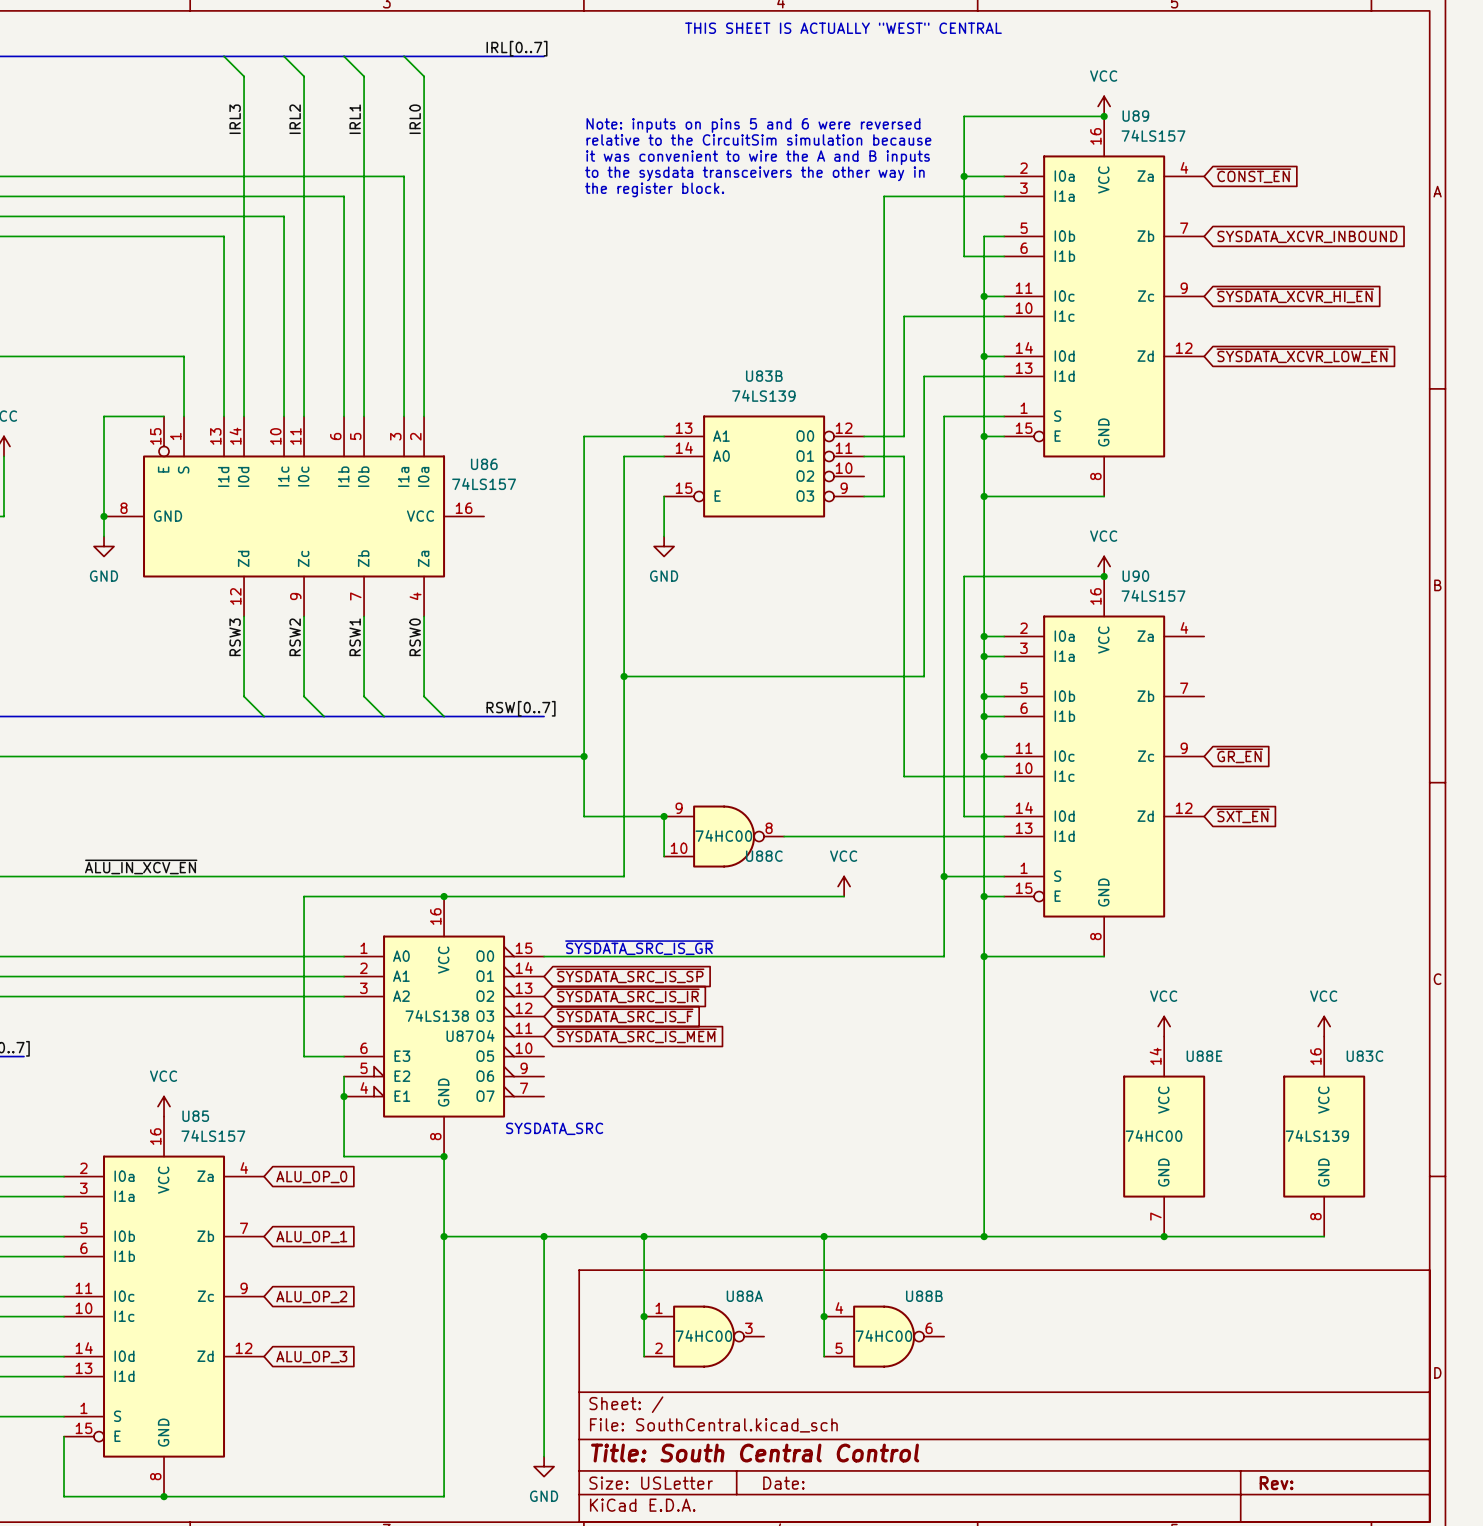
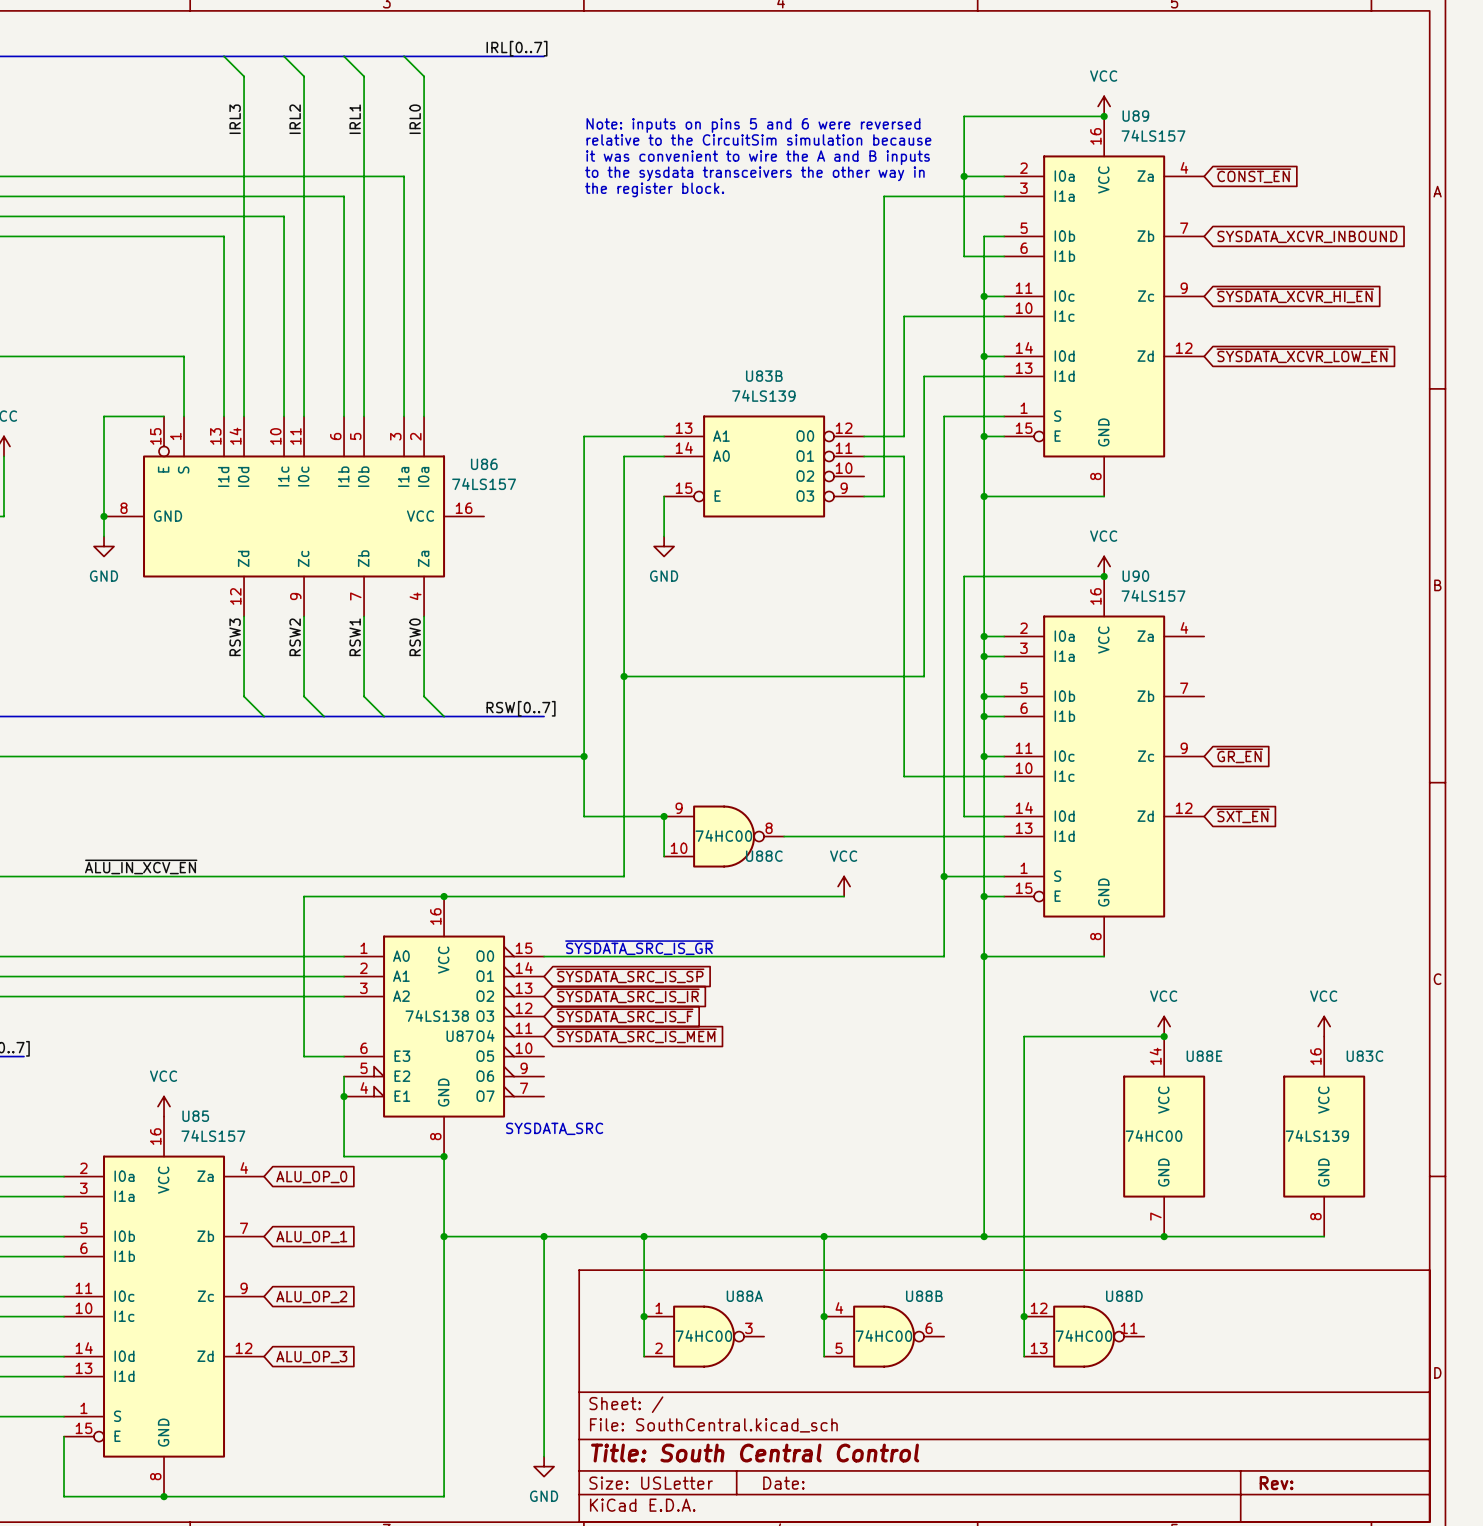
text: THIS SHEET IS ACTUALLY "WEST" CENTRAL (843, 28) -> none
wire: none -> (1164, 1036) (1024, 1036) (1024, 1356)
junction: none -> (1164, 1036)
junction: none -> (1024, 1316)
U88D: none -> 74HC00 (1084, 1336)

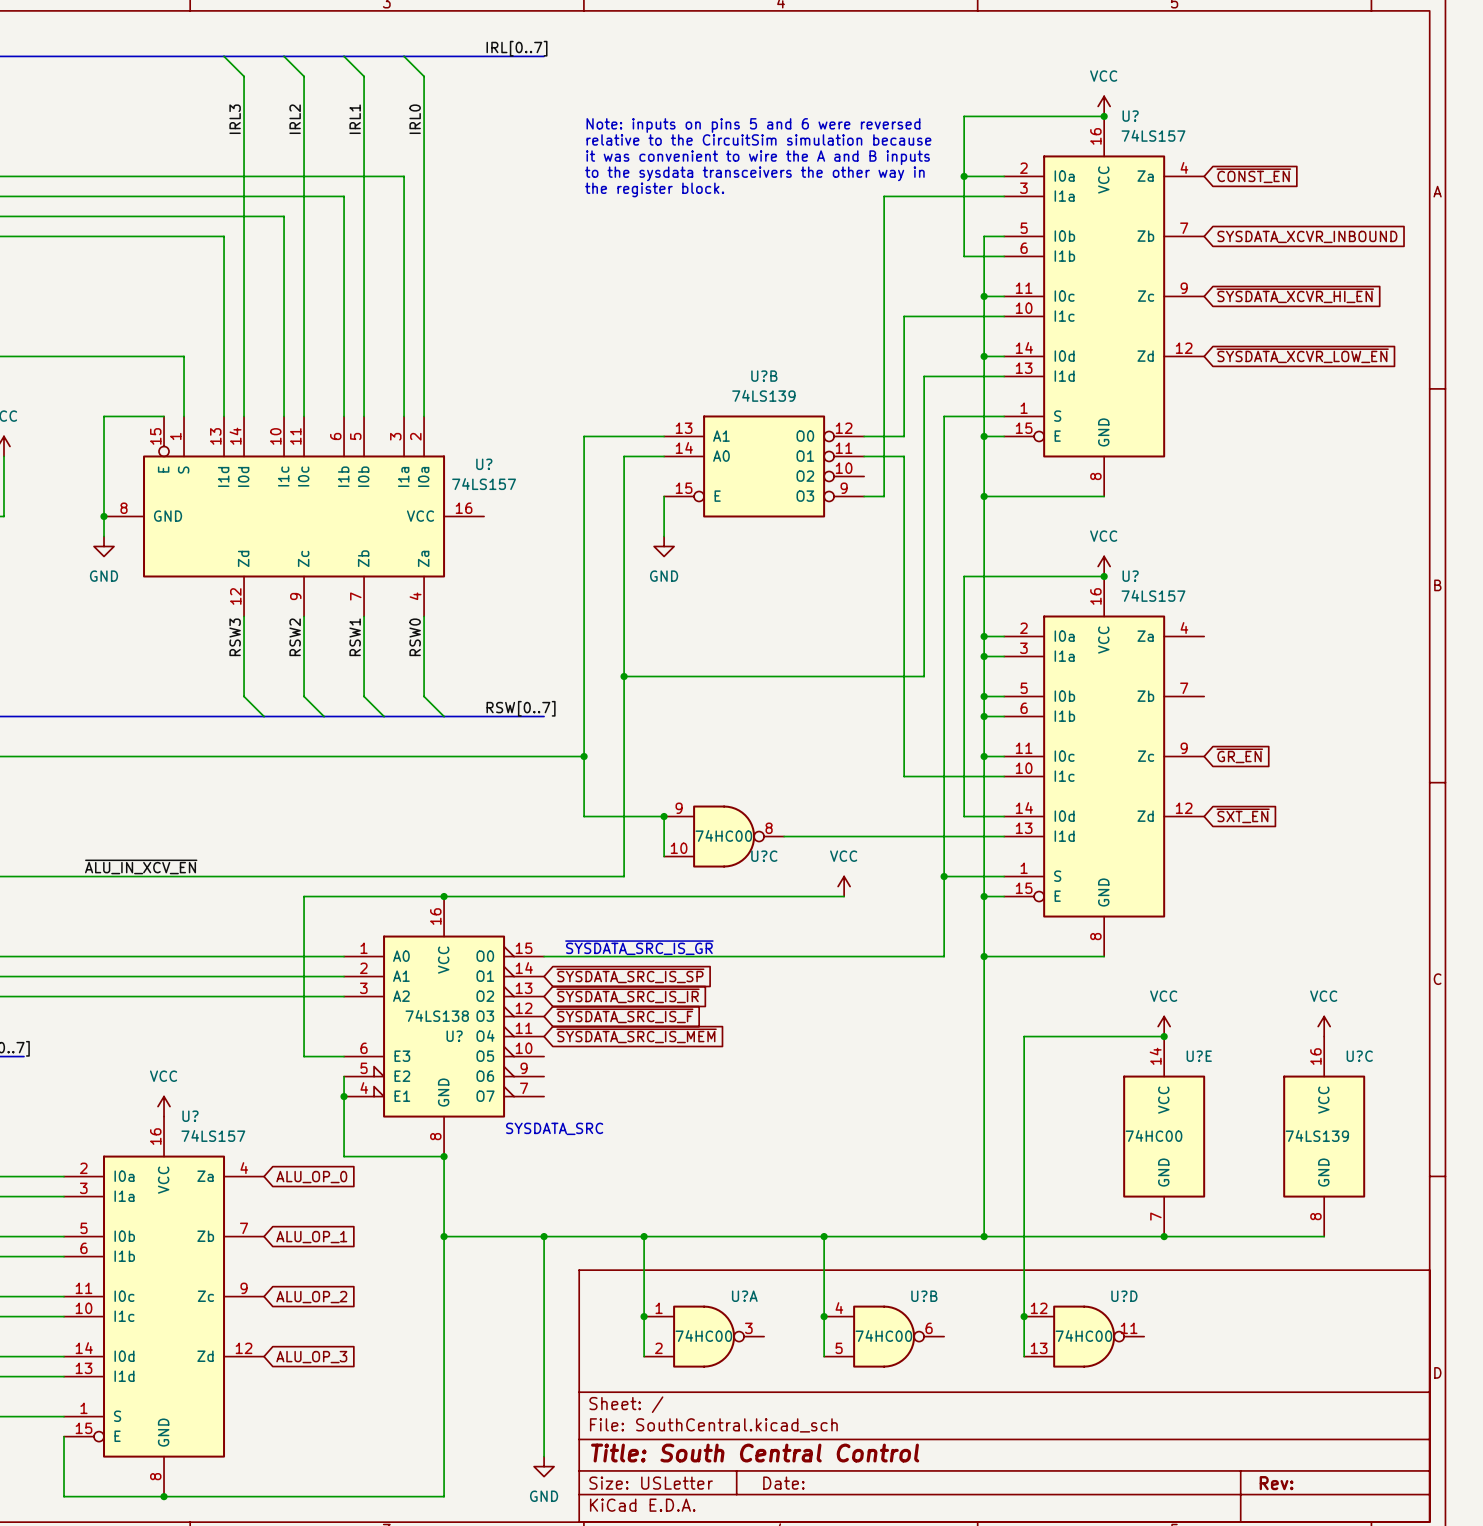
U89 name: U89 (1135, 116) -> U? (1130, 116)
U83B name: U83B (764, 376) -> U?B (764, 376)
U86 name: U86 (484, 464) -> U? (484, 464)
U90 name: U90 (1135, 576) -> U? (1130, 576)
U88C name: U88C (764, 856) -> U?C (764, 856)
U87 name: U87 (460, 1036) -> U? (454, 1036)
U88E name: U88E (1204, 1056) -> U?E (1199, 1056)
U83C name: U83C (1364, 1056) -> U?C (1359, 1056)
U85 name: U85 (195, 1116) -> U? (190, 1116)
U88A name: U88A (744, 1296) -> U?A (744, 1296)
U88B name: U88B (924, 1296) -> U?B (924, 1296)
U88D name: U88D (1124, 1296) -> U?D (1124, 1296)

